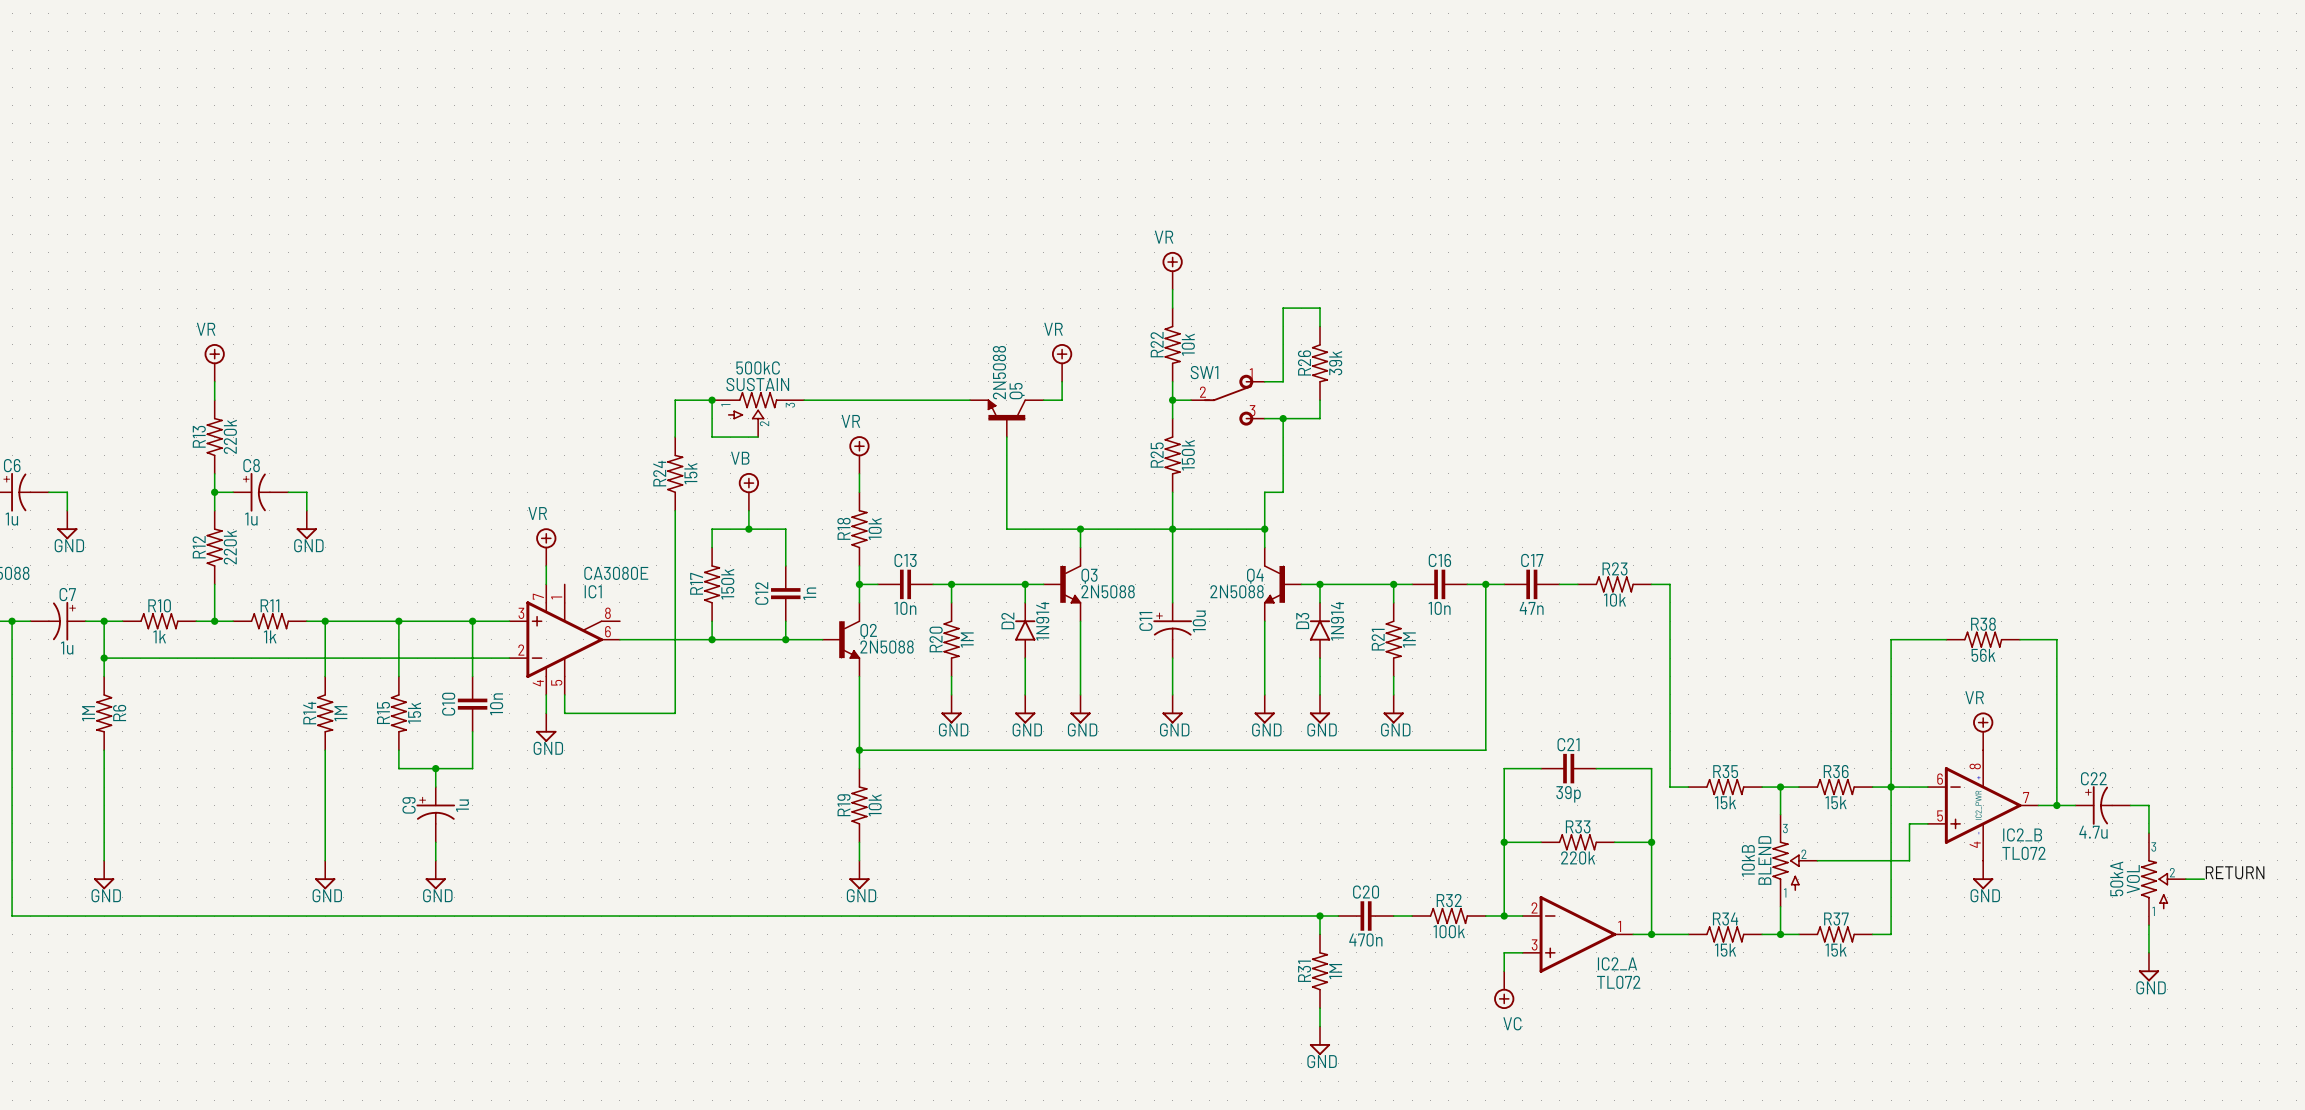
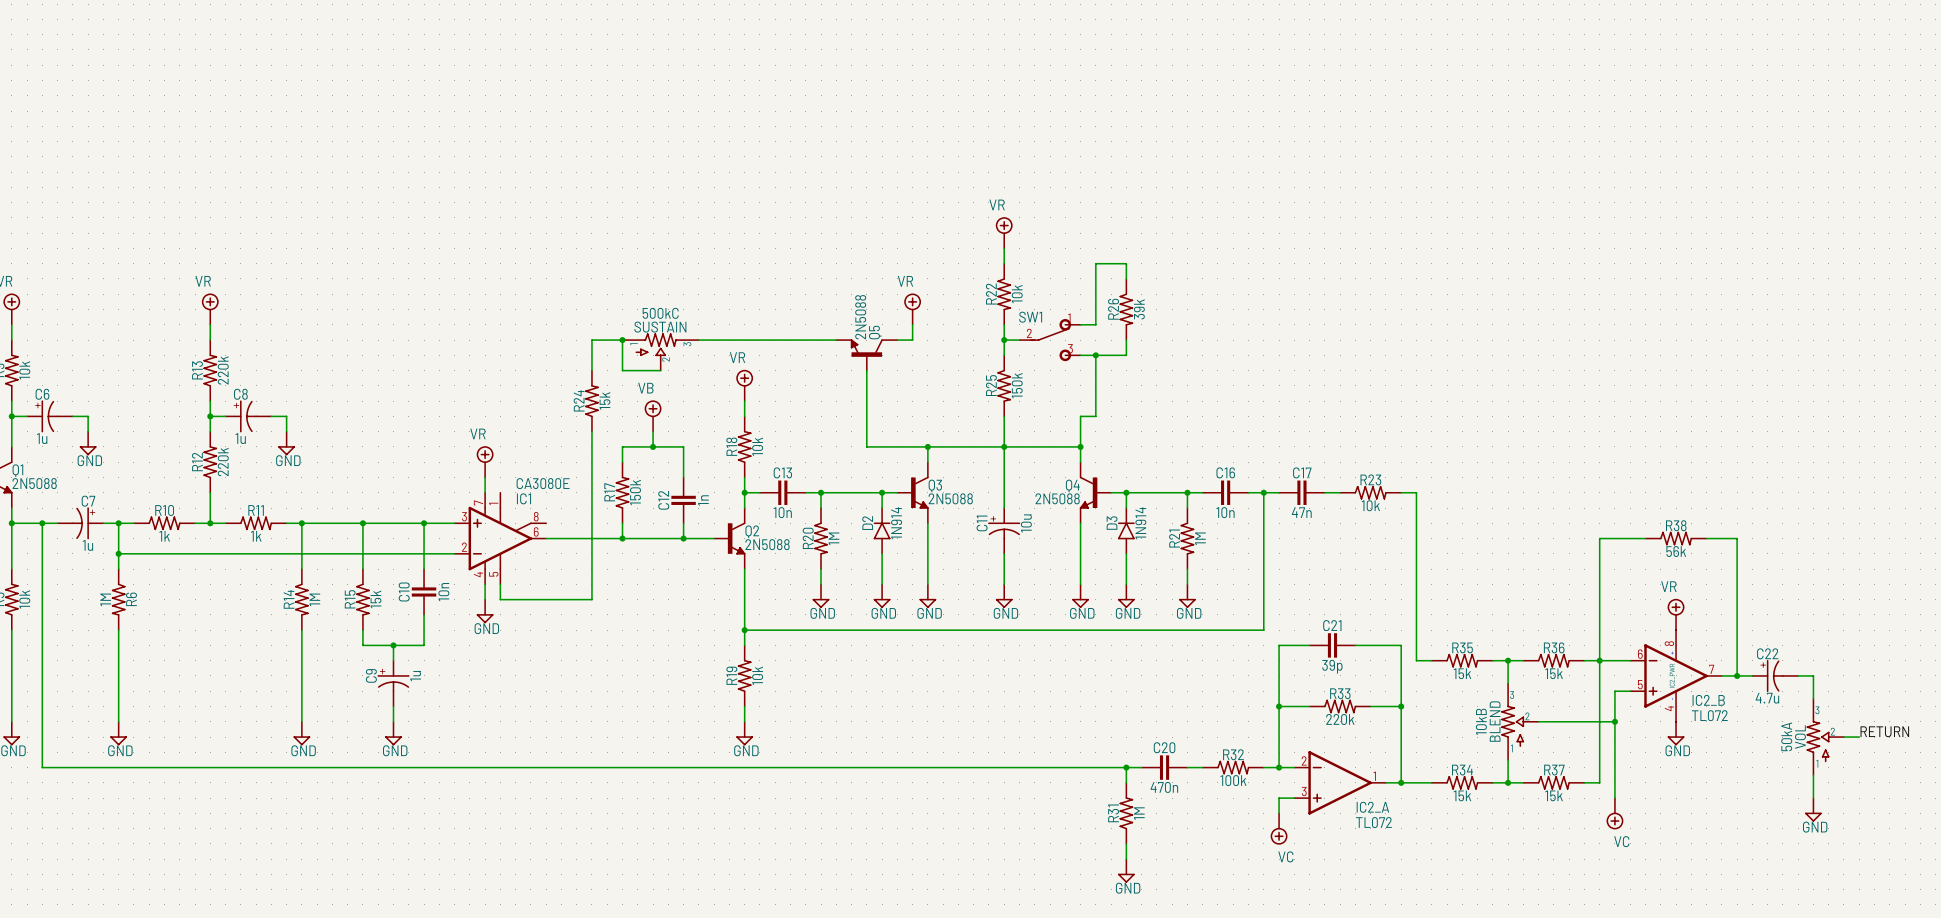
wire: none -> (1614, 721) (1614, 798)
junction: none -> (1614, 721)
power symbol: none -> VC (1614, 813)

